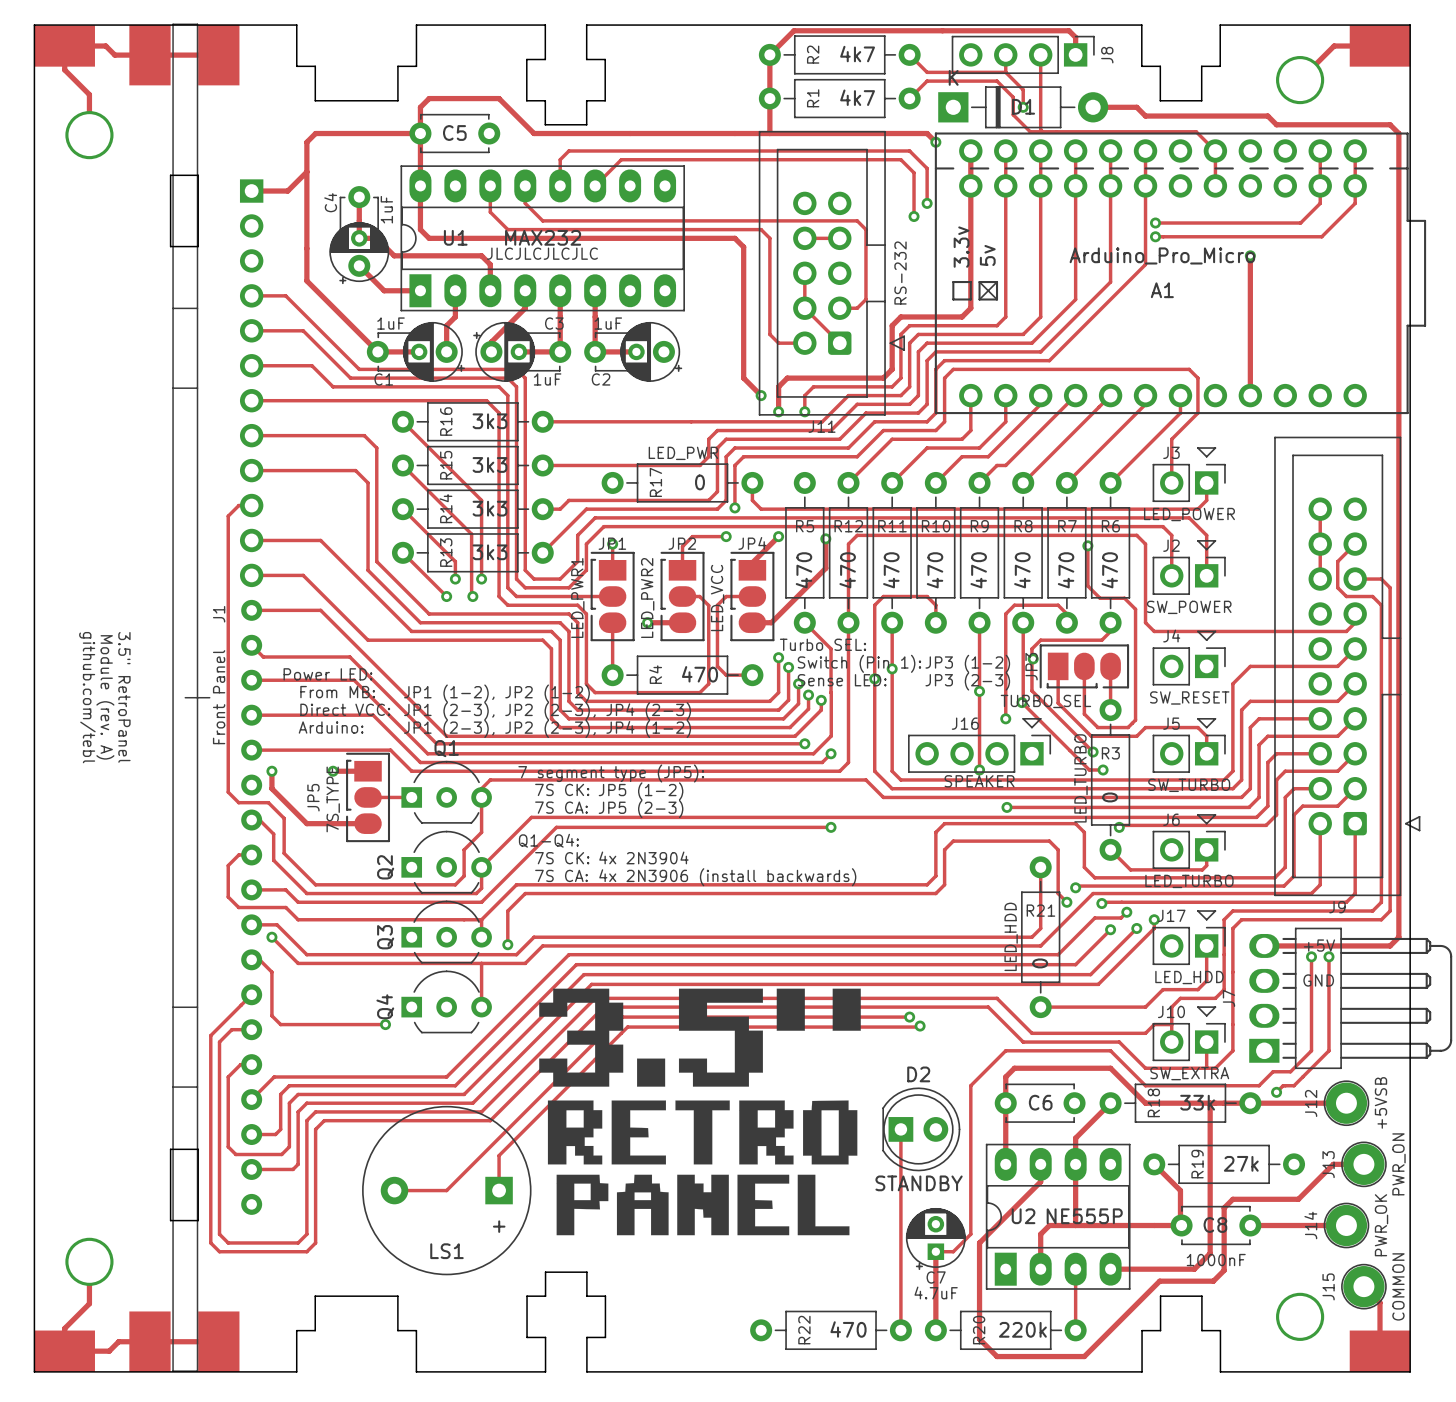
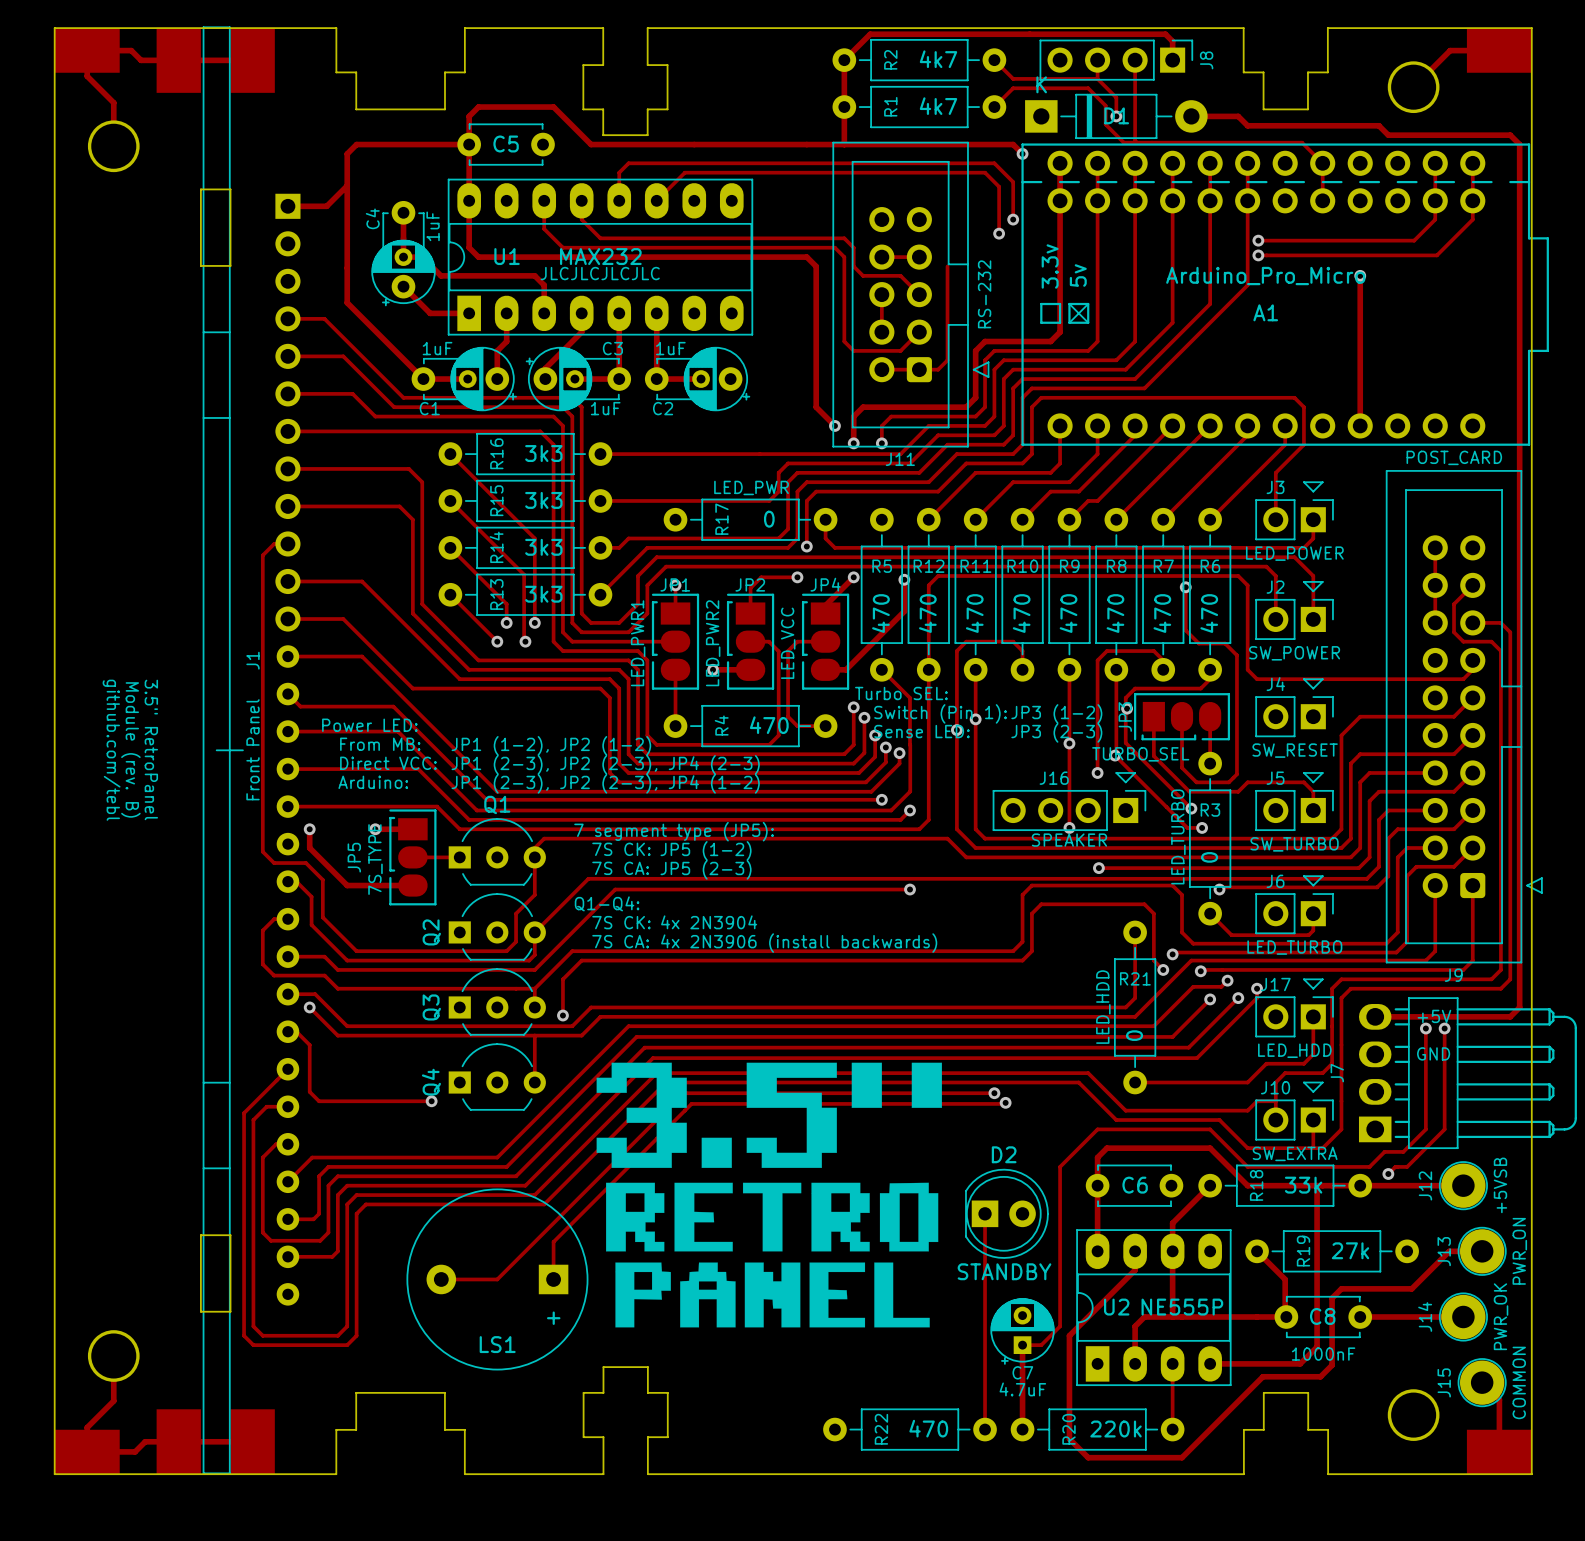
track: (769, 220) (857, 220) (865, 229) (865, 247) -> (844, 238) (853, 247) (853, 266) (863, 275) (900, 275) (919, 294)
track: (865, 299) (857, 308) (839, 308) -> (947, 322) (947, 360) (938, 369) (881, 369)
track: (804, 308) (839, 343) -> none
track: (769, 316) (769, 334) (778, 343) (804, 343) -> (844, 341) (853, 350) (900, 350) (919, 332)
J9 value: none -> POST_CARD (1454, 457)
text: Module (rev. A) (105, 697) -> Module (rev. B) (130, 749)

